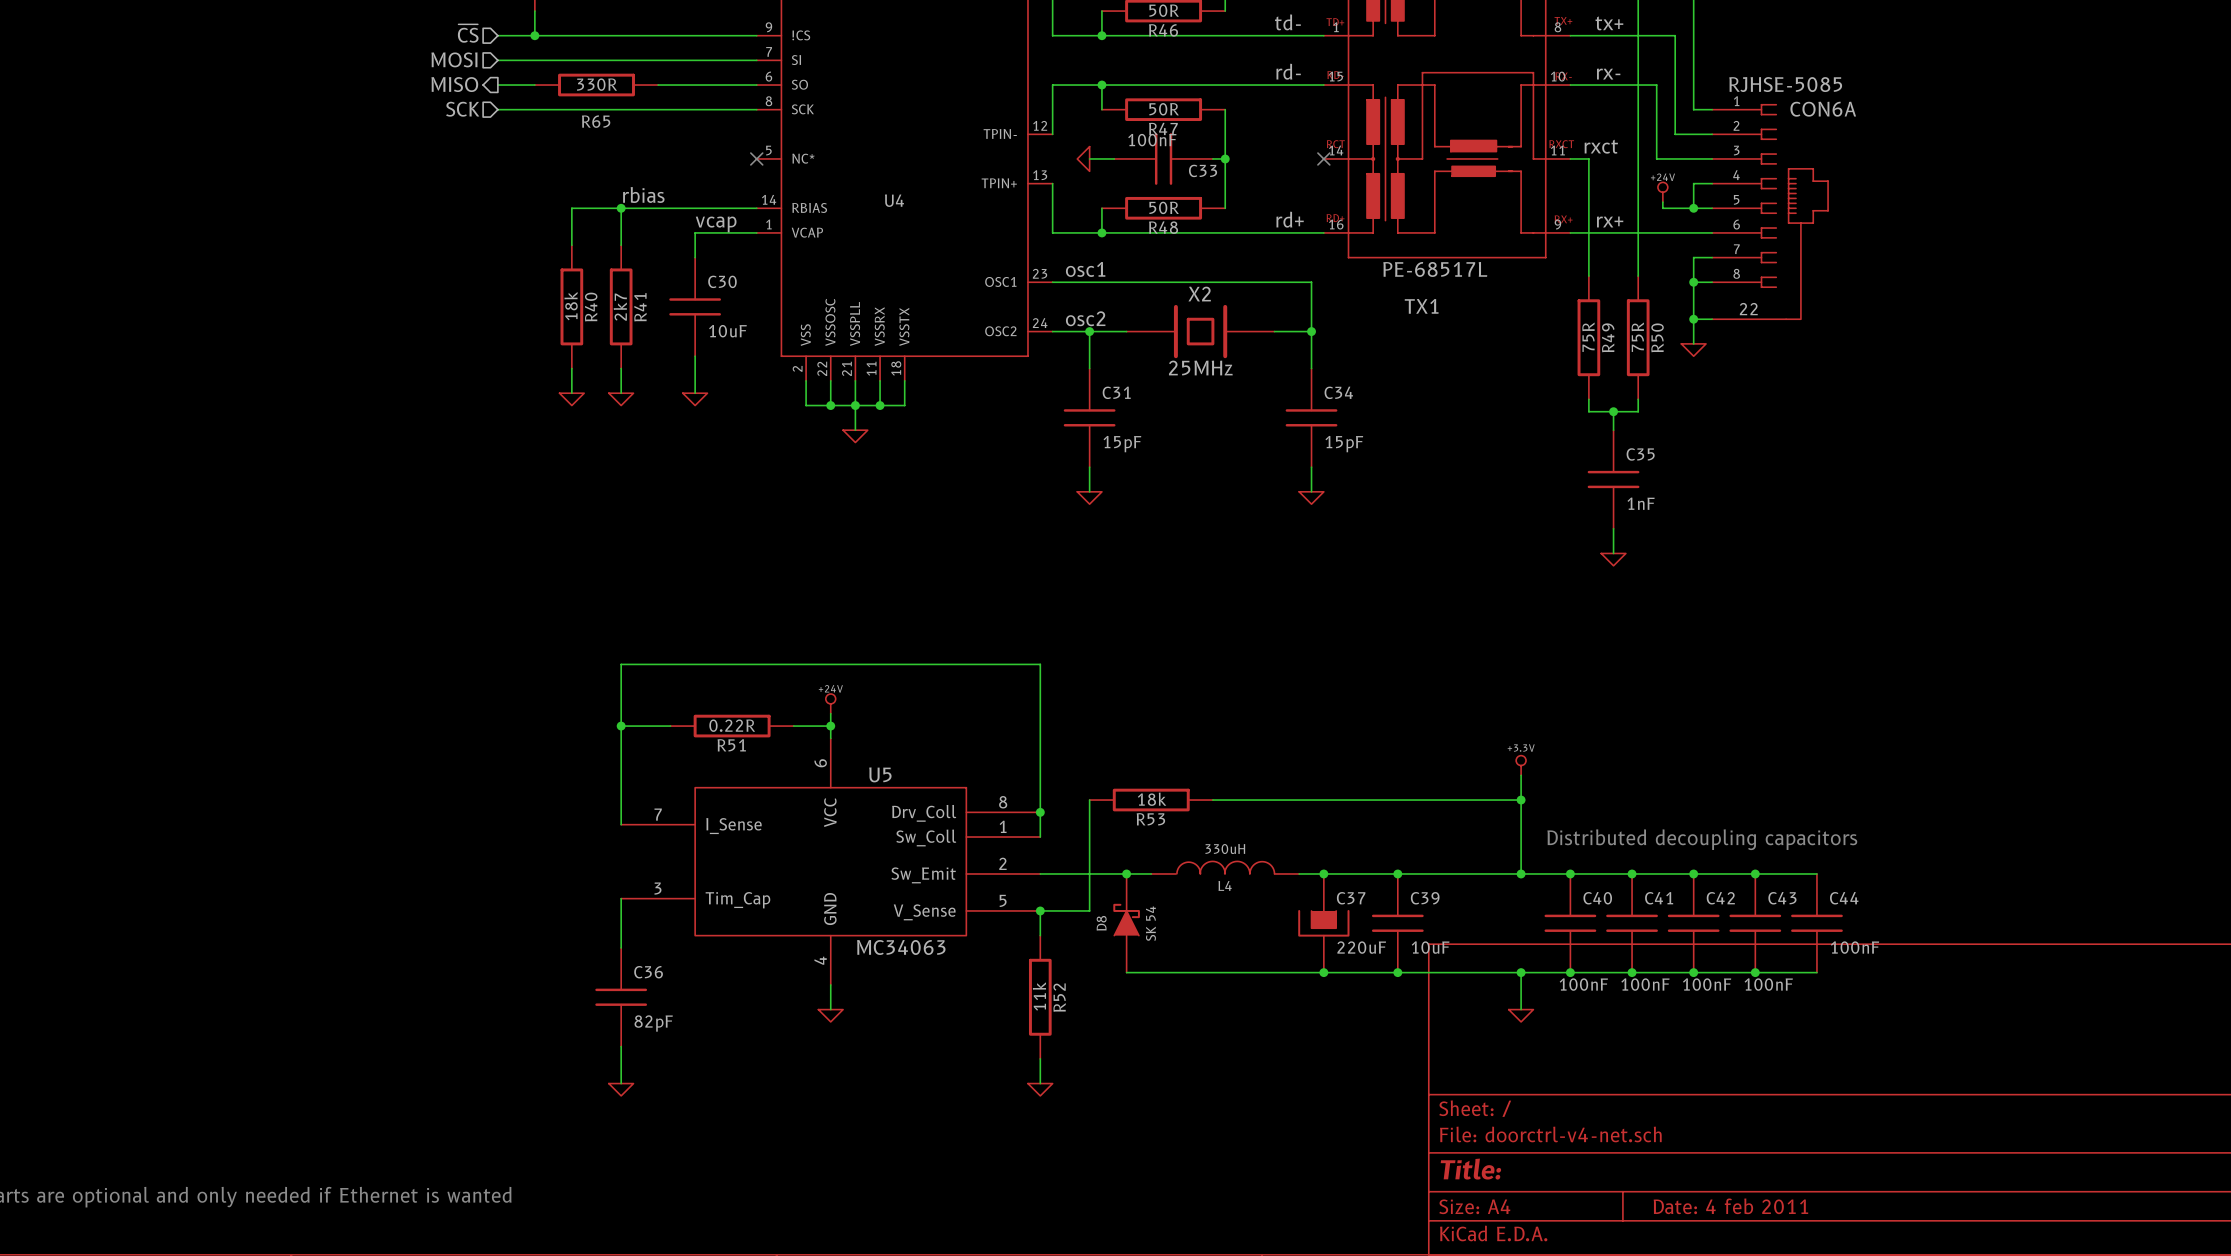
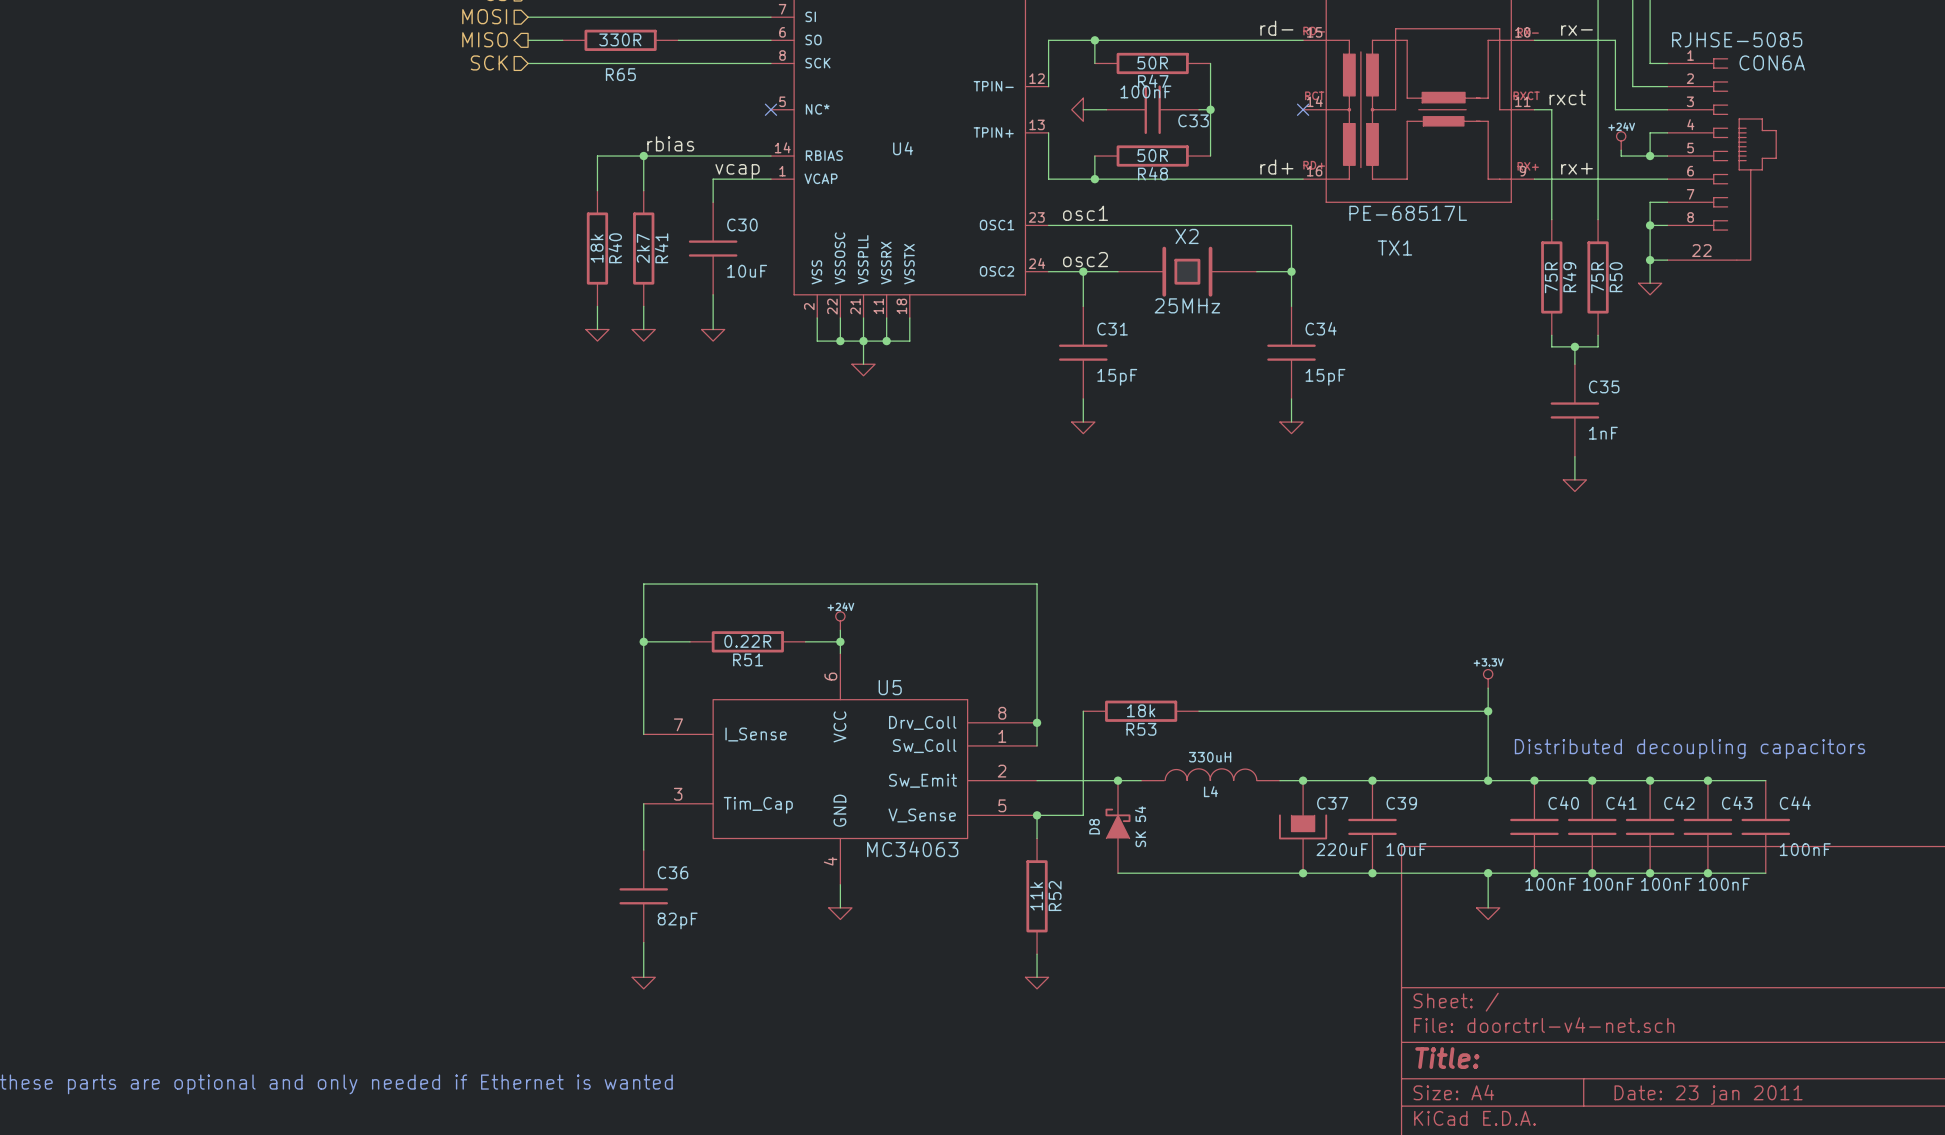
title block: Date: 4 feb 2011 (1730, 1206) -> Date: 23 jan 2011 (1708, 1095)

